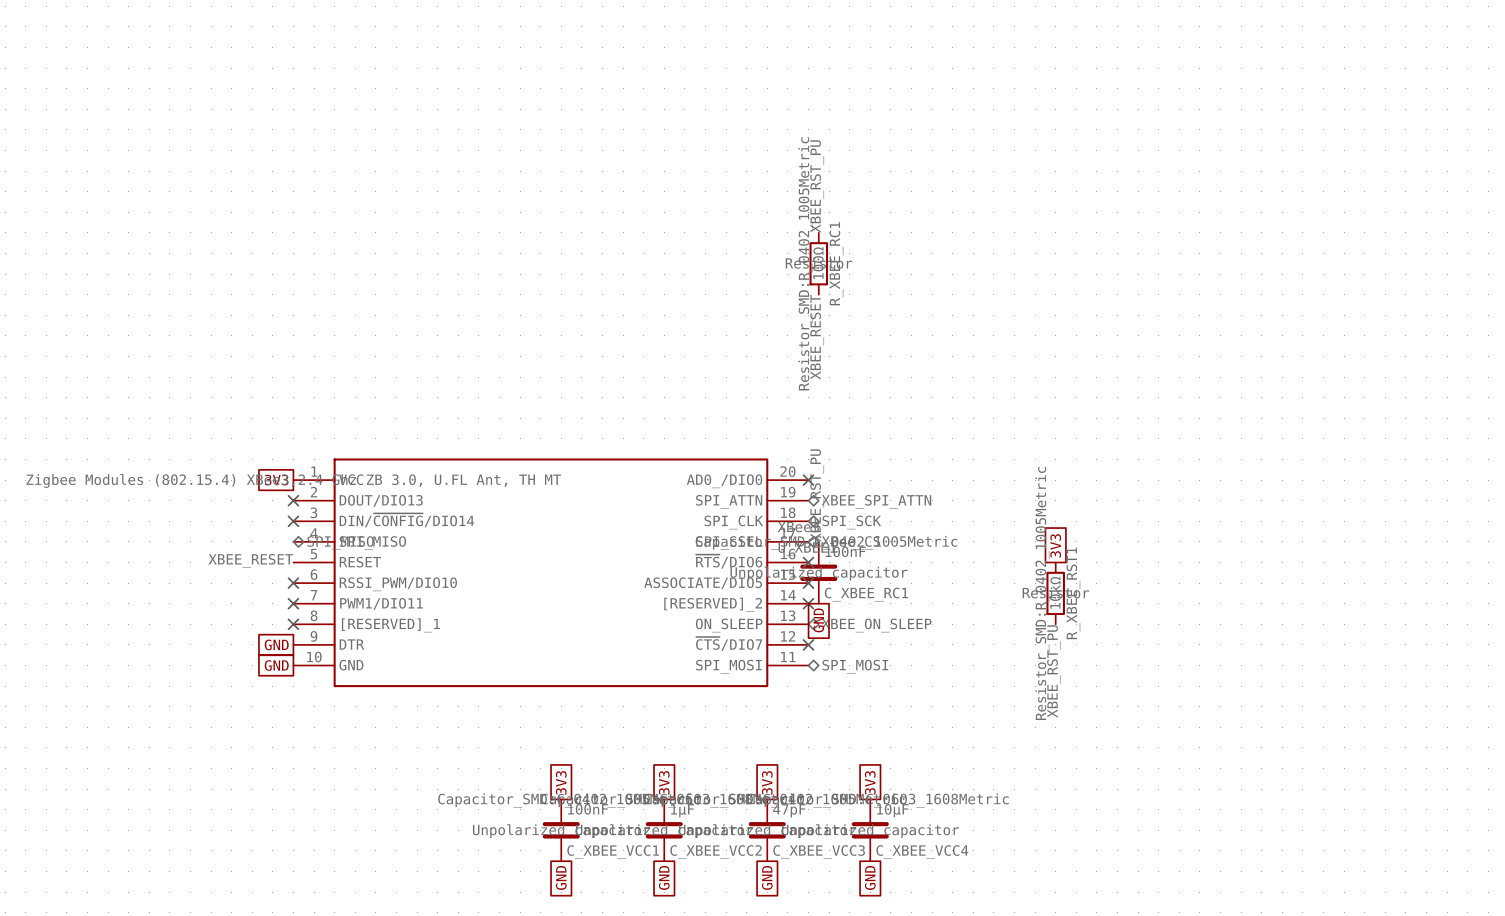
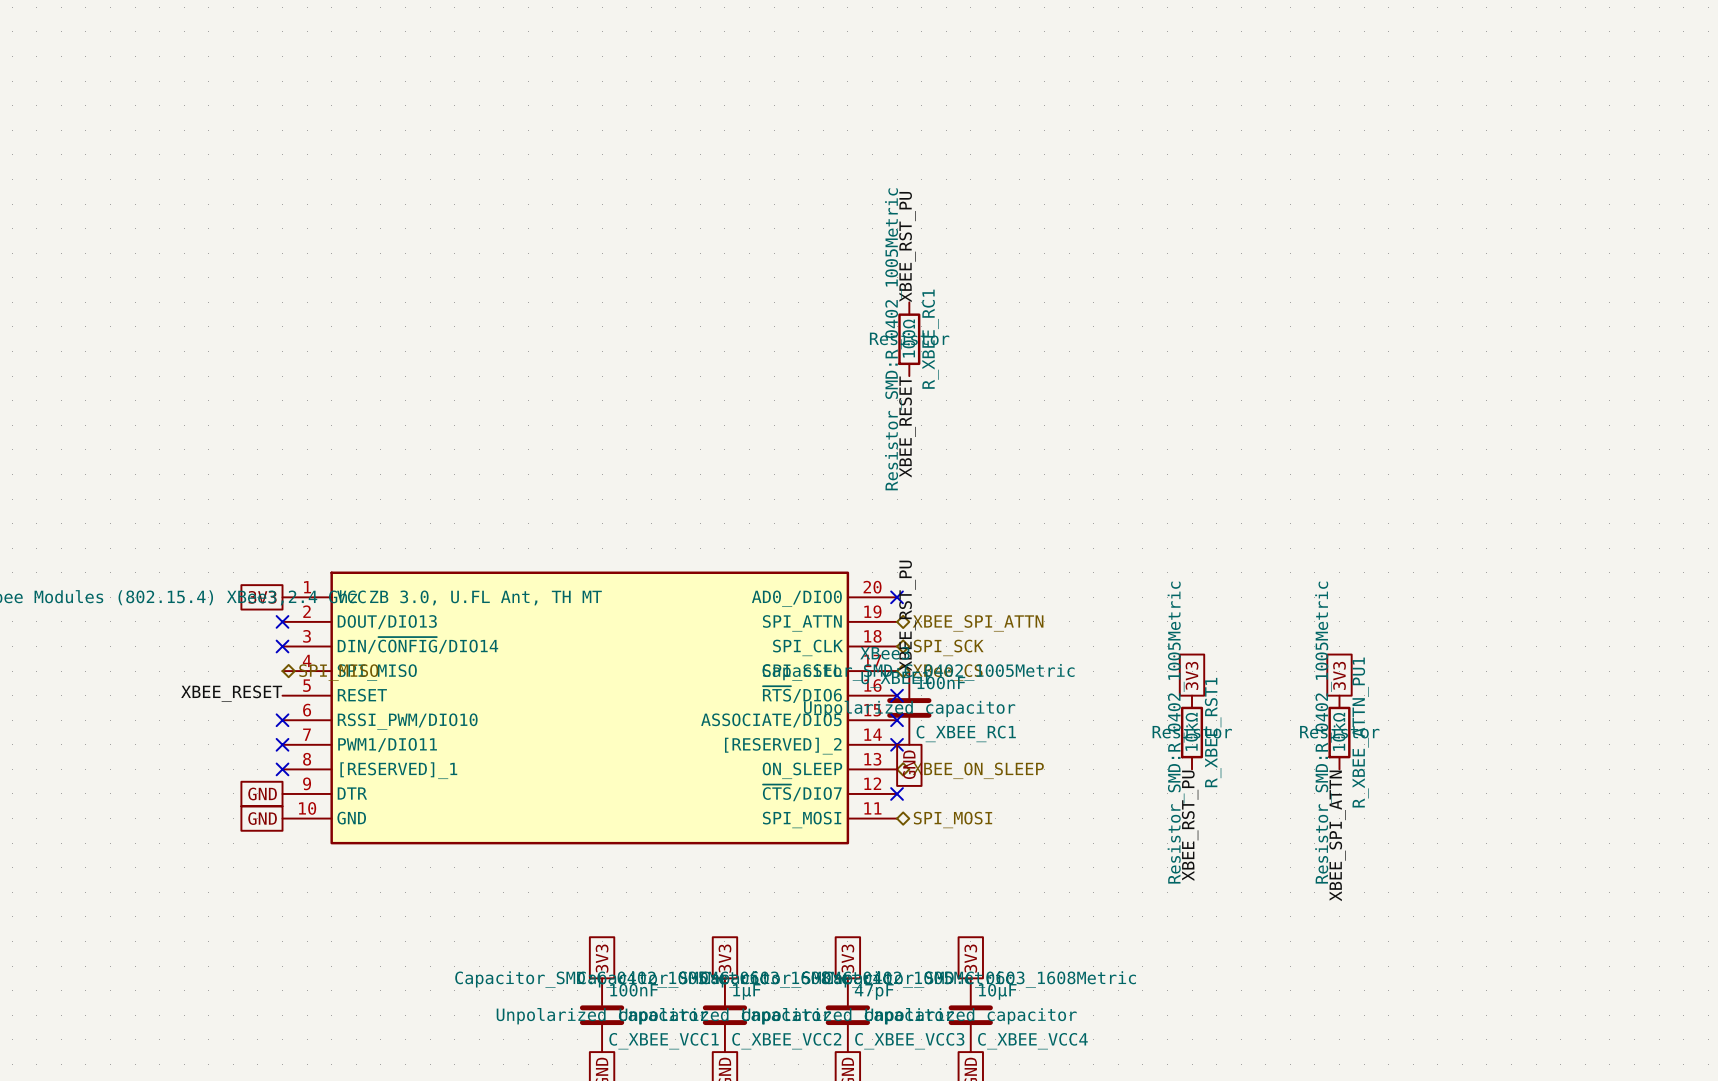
global label: none -> 3V3 (1339, 675)
R_XBEE_ATTN_PU1: none -> 10kΩ (1339, 732)
label: none -> XBEE_SPI_ATTN (1337, 835)

